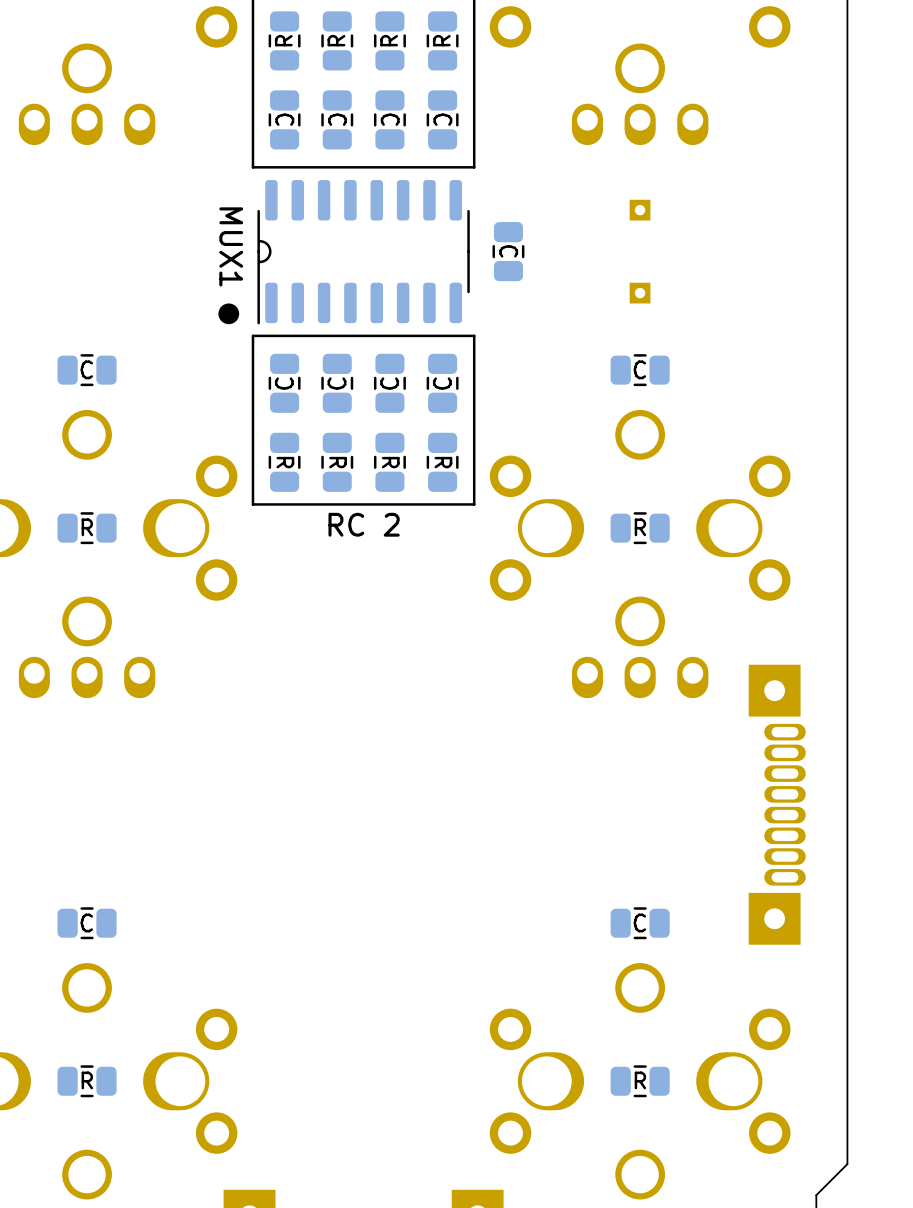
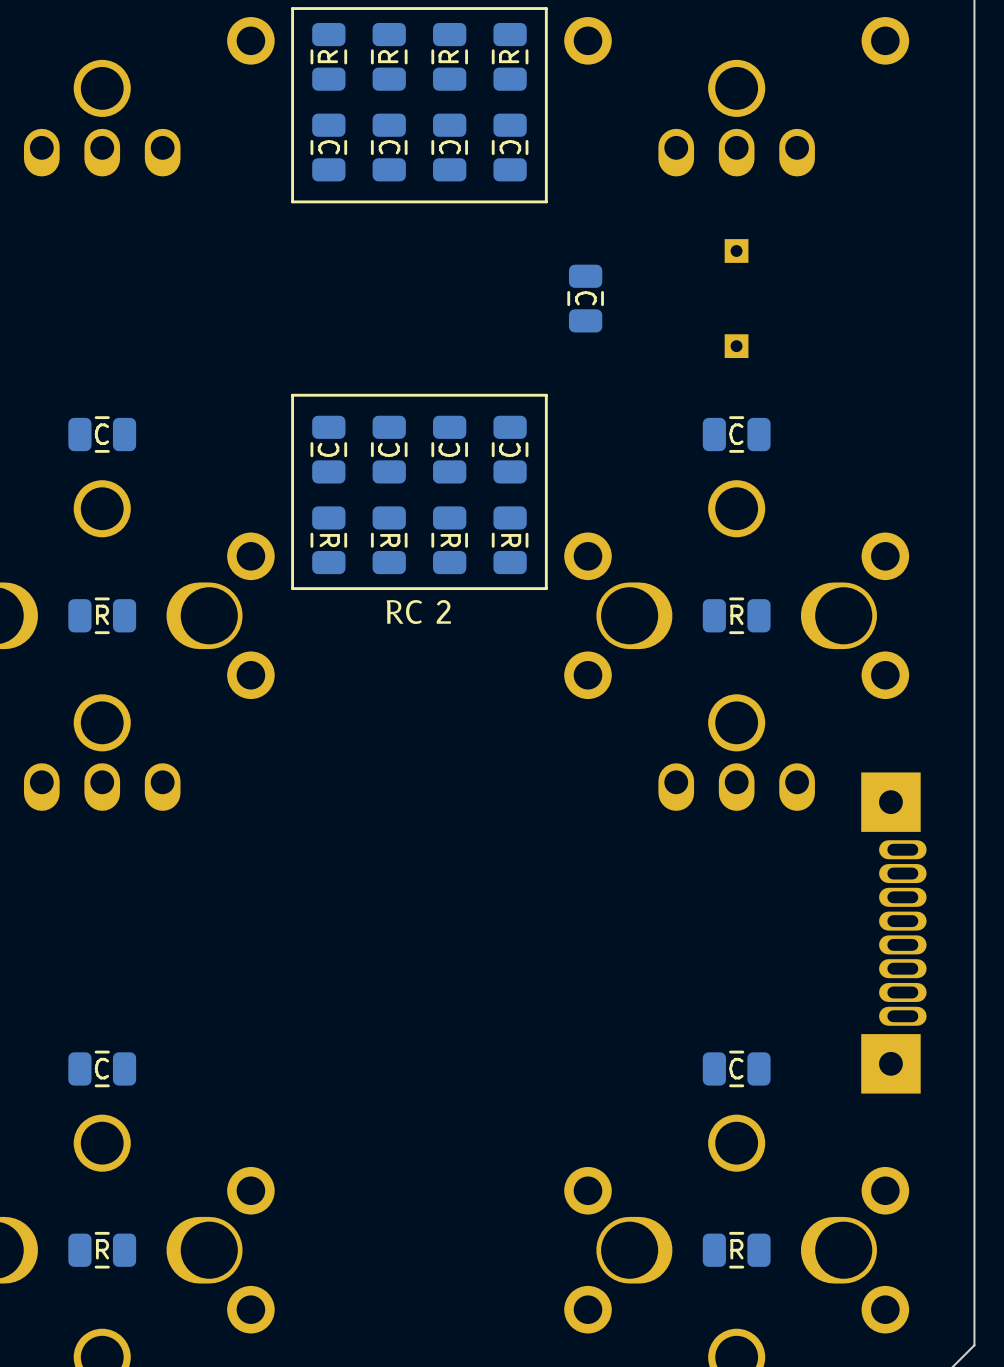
text: MUX1 (231, 246) -> none
part: (344, 252) -> none

